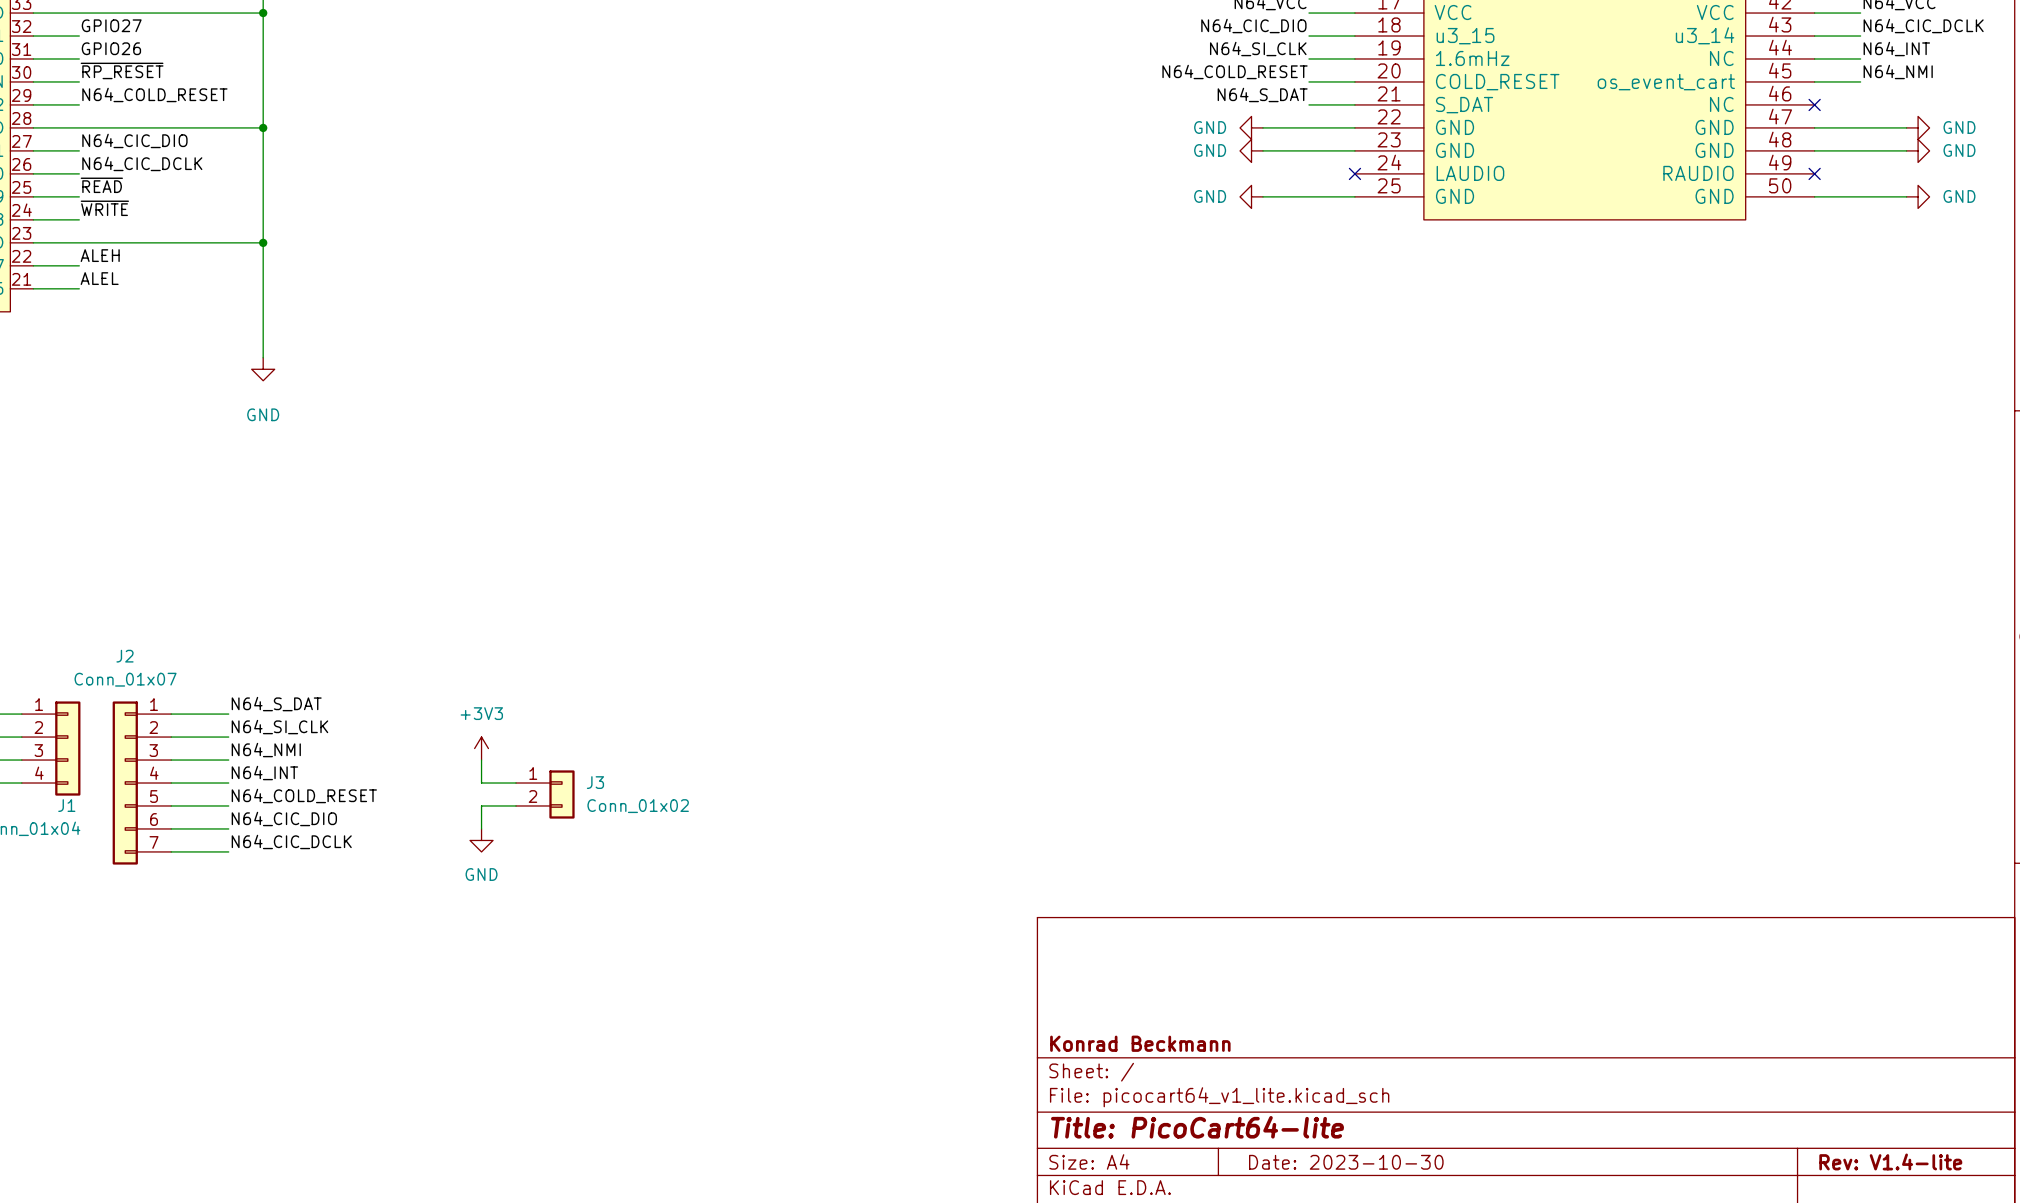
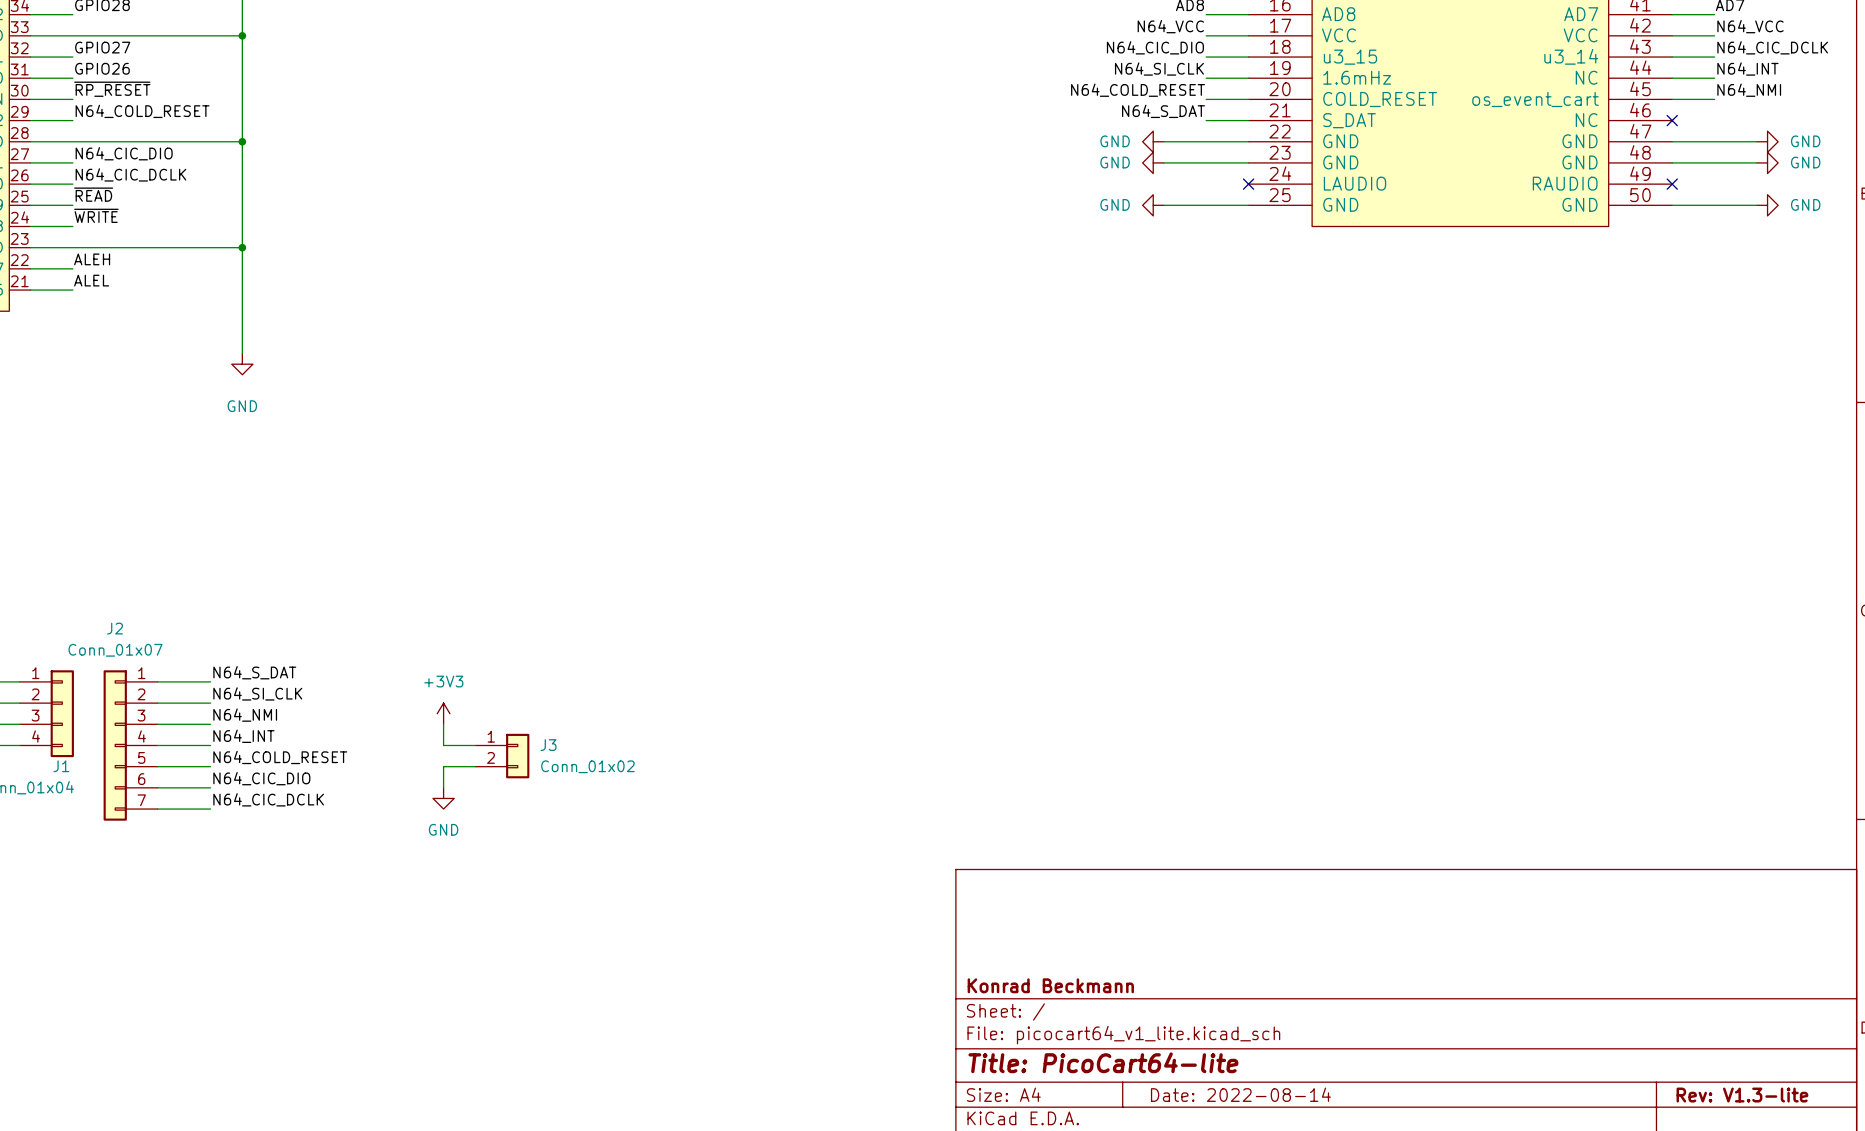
title block: Rev: V1.4-lite (1890, 1161) -> Rev: V1.3-lite (1742, 1095)
title block: Date: 2023-10-30 (1346, 1162) -> Date: 2022-08-14 (1240, 1094)

